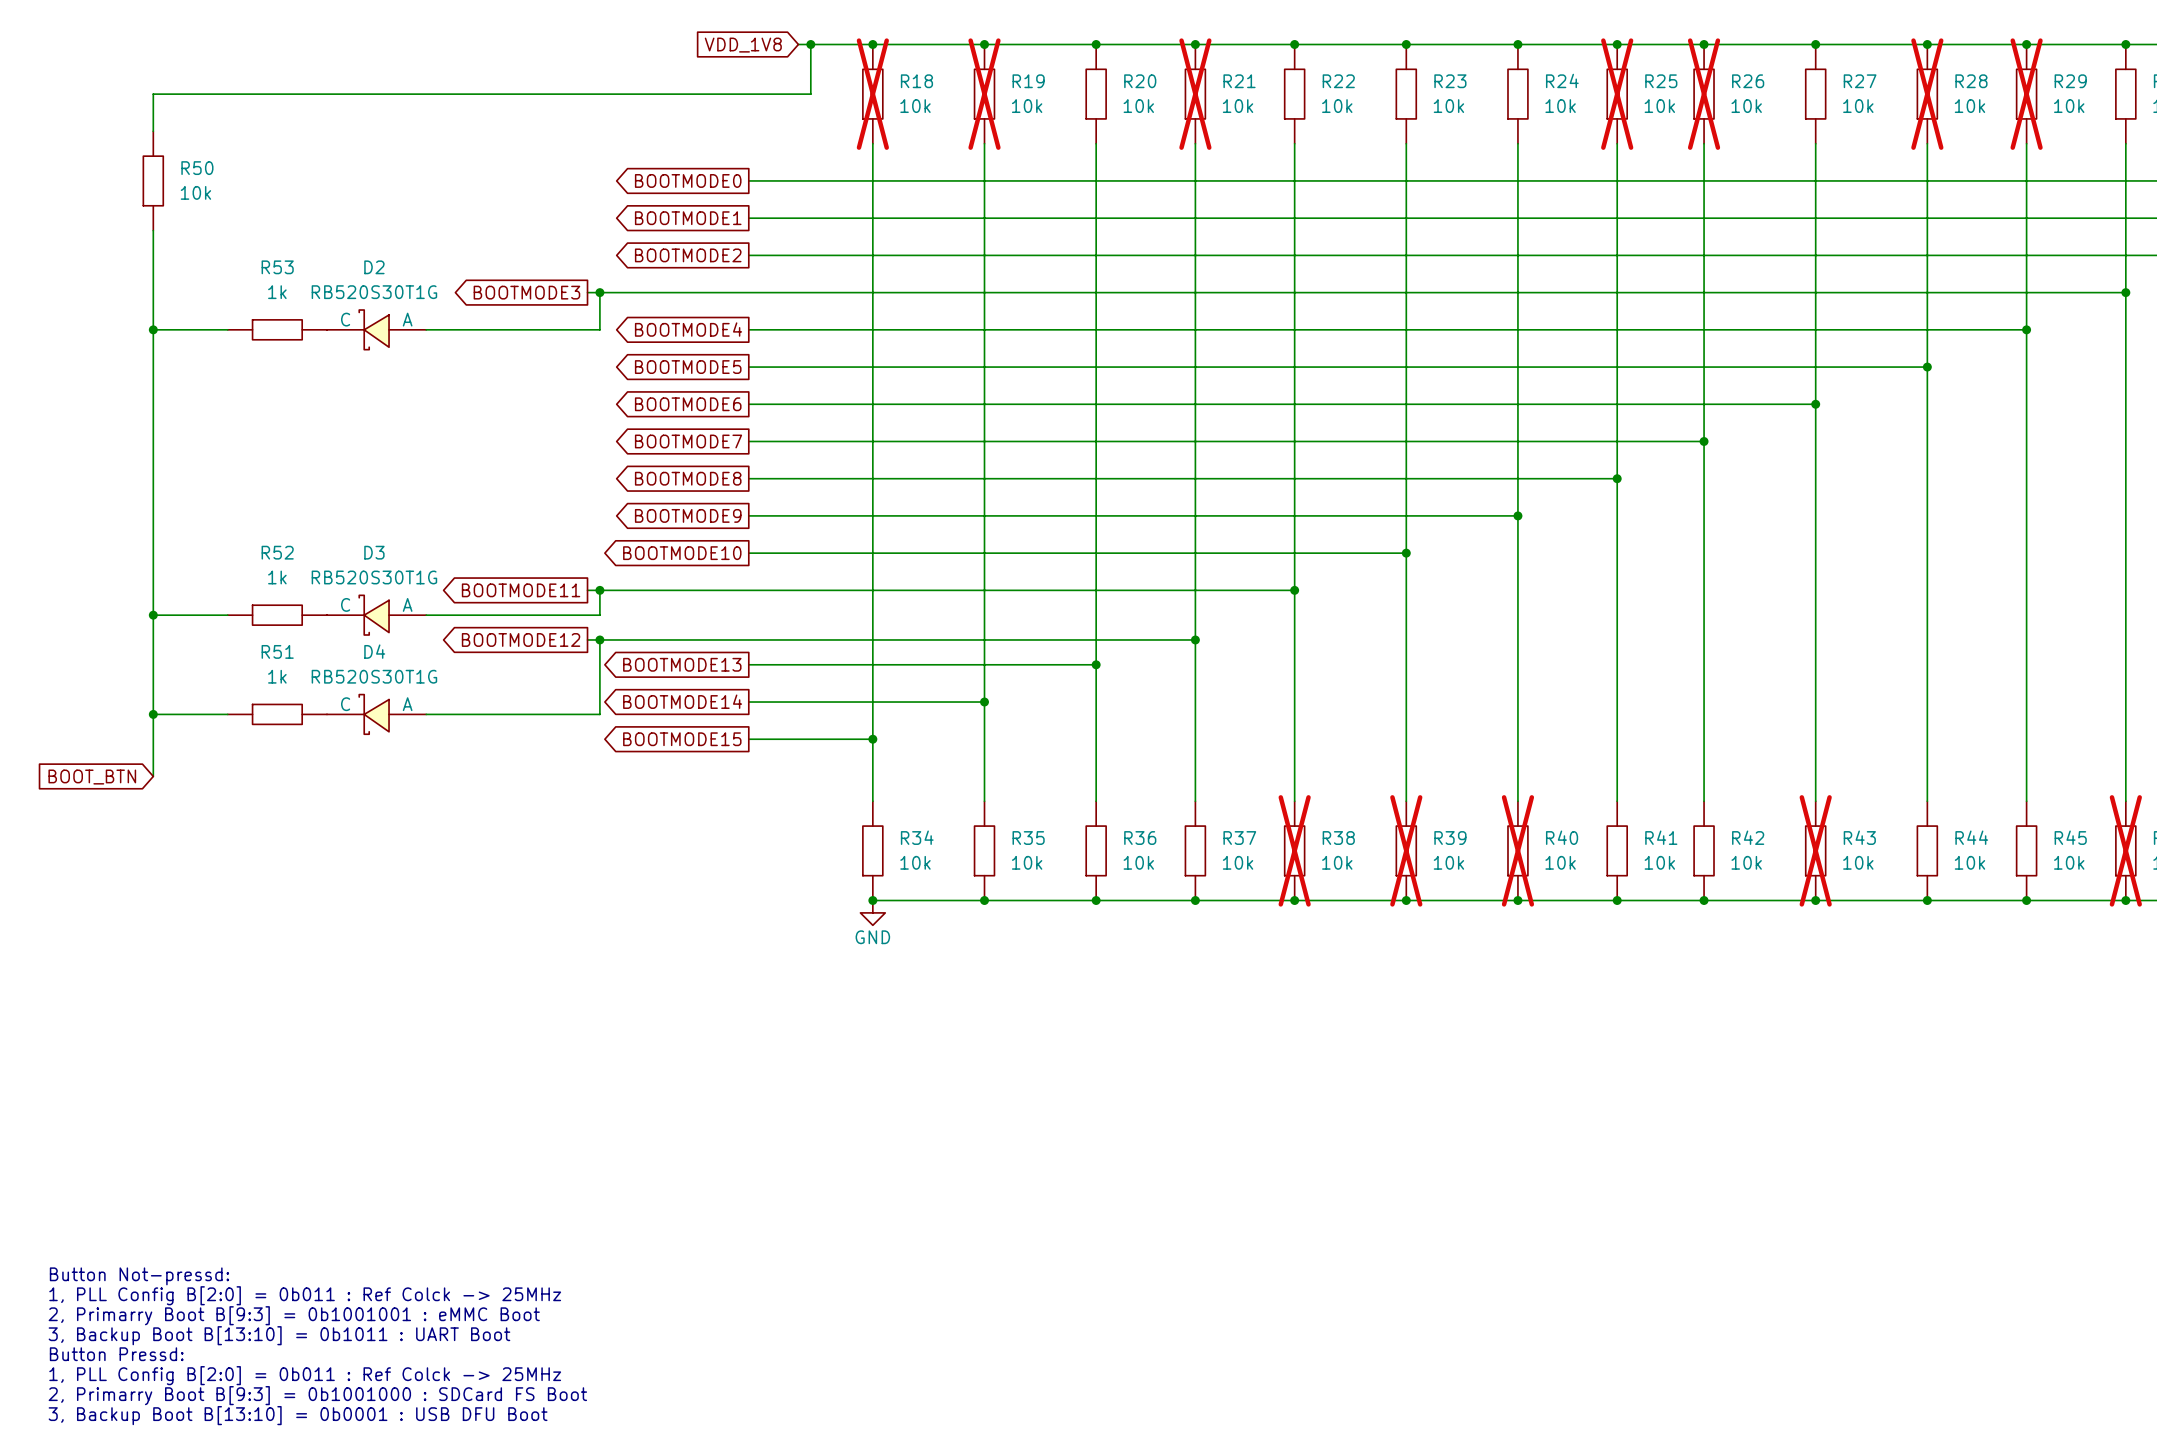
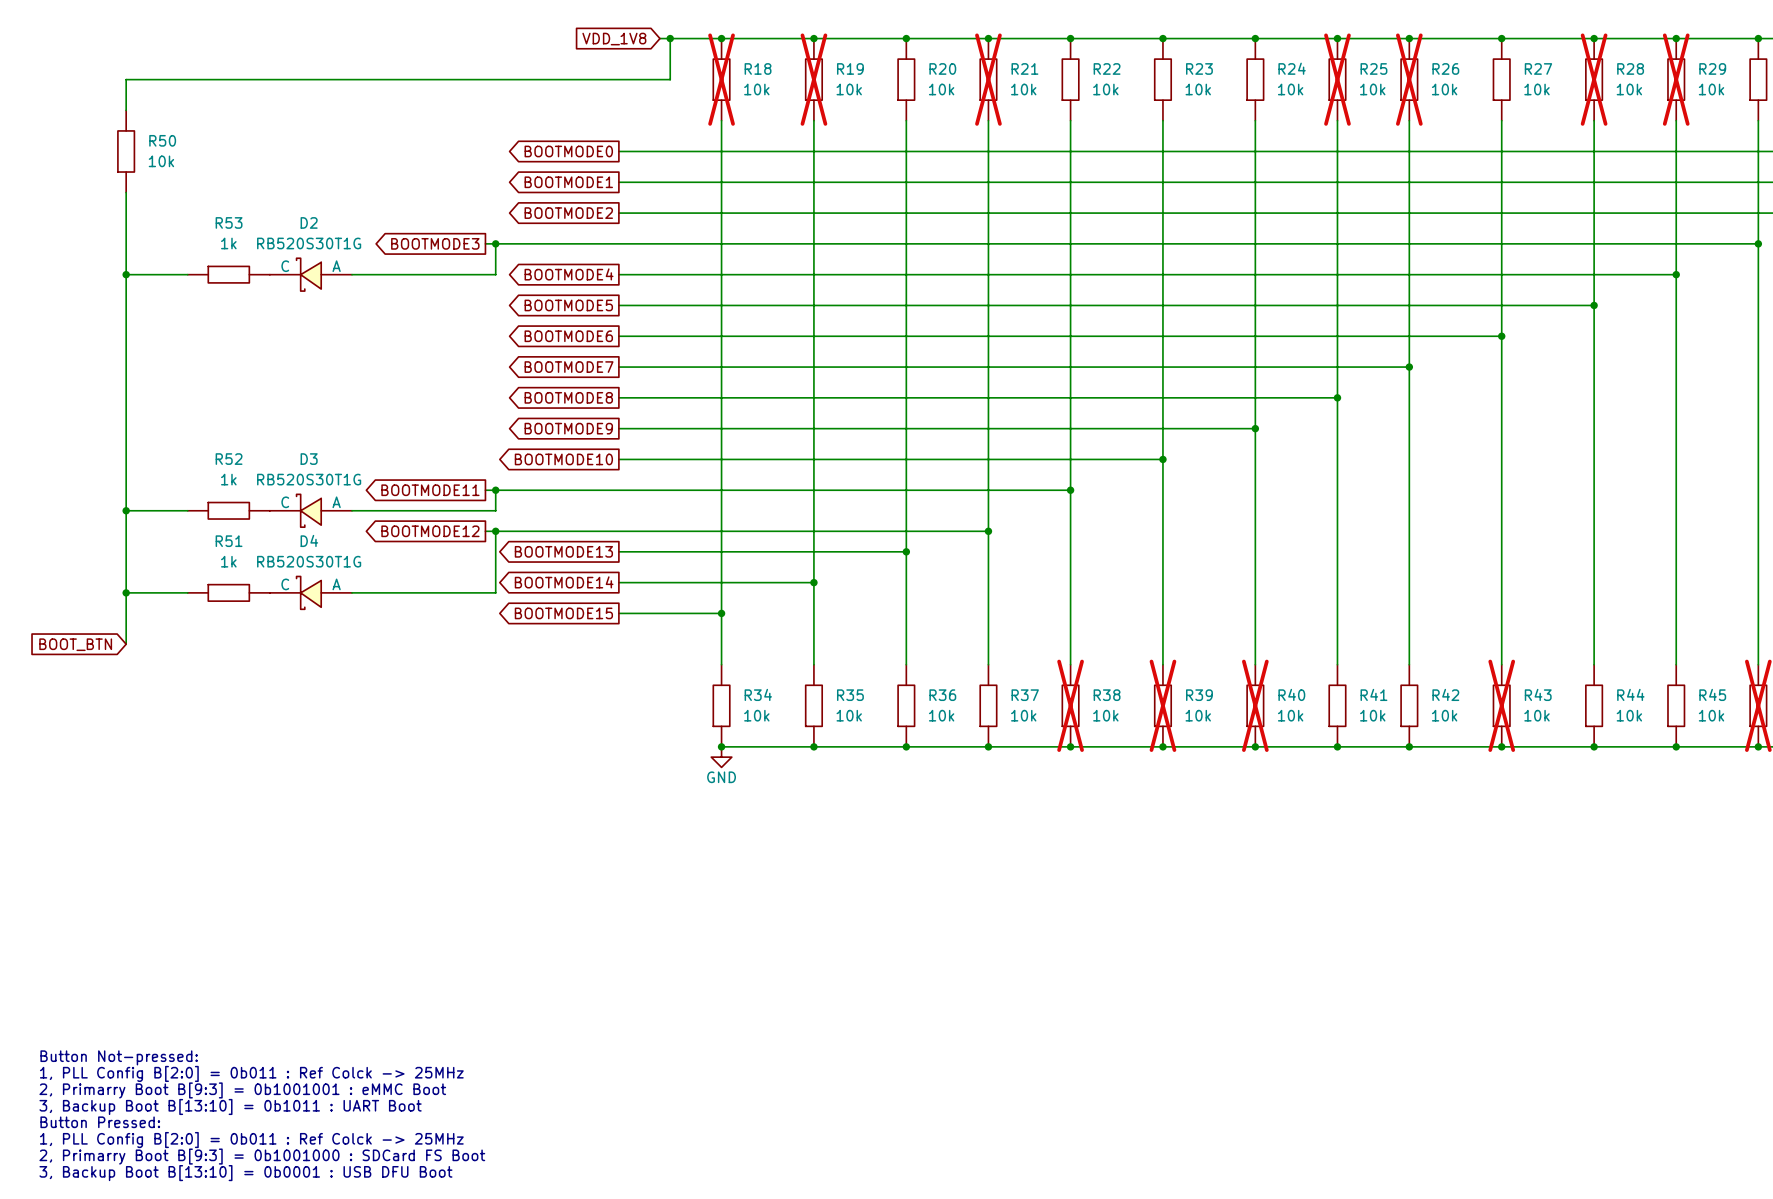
text: Button Not-pressd: (139, 1276) -> Button Not-pressed: (119, 1057)
text: Button Pressd: (116, 1354) -> Button Pressed: (100, 1122)

